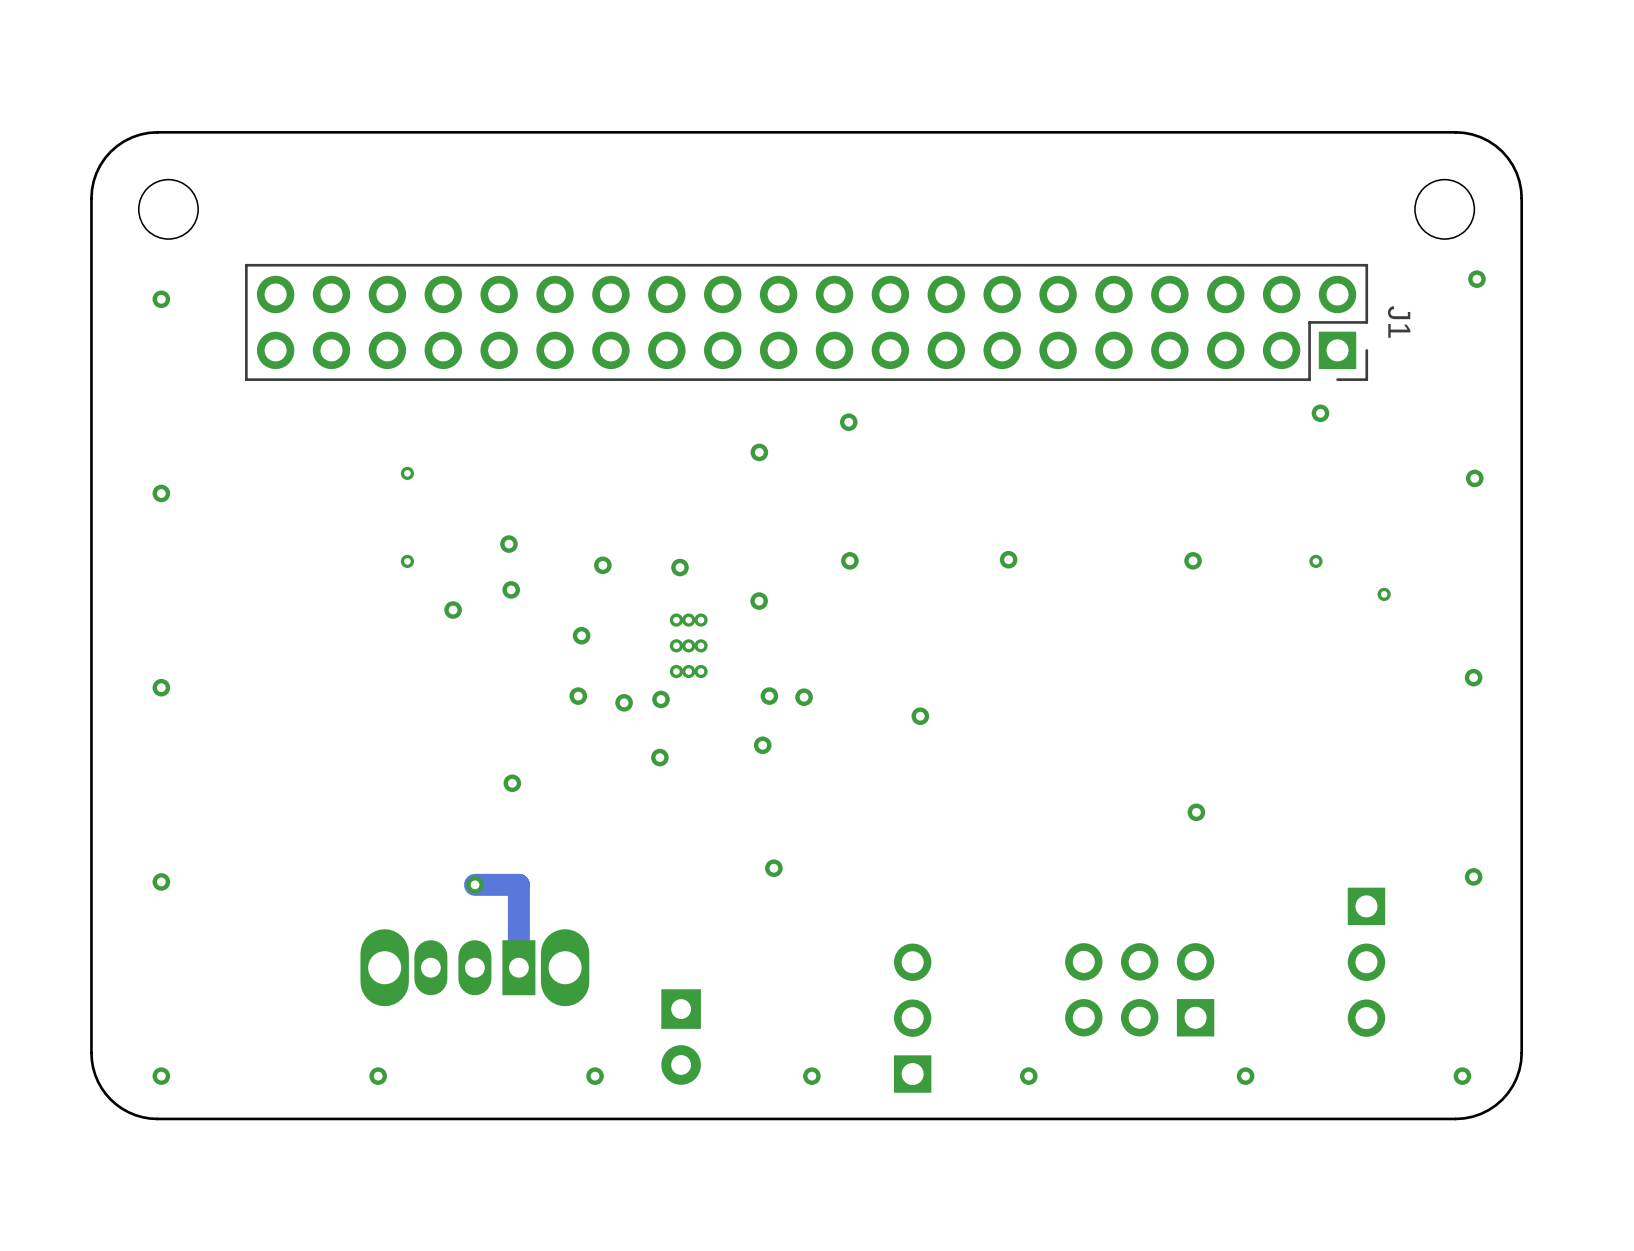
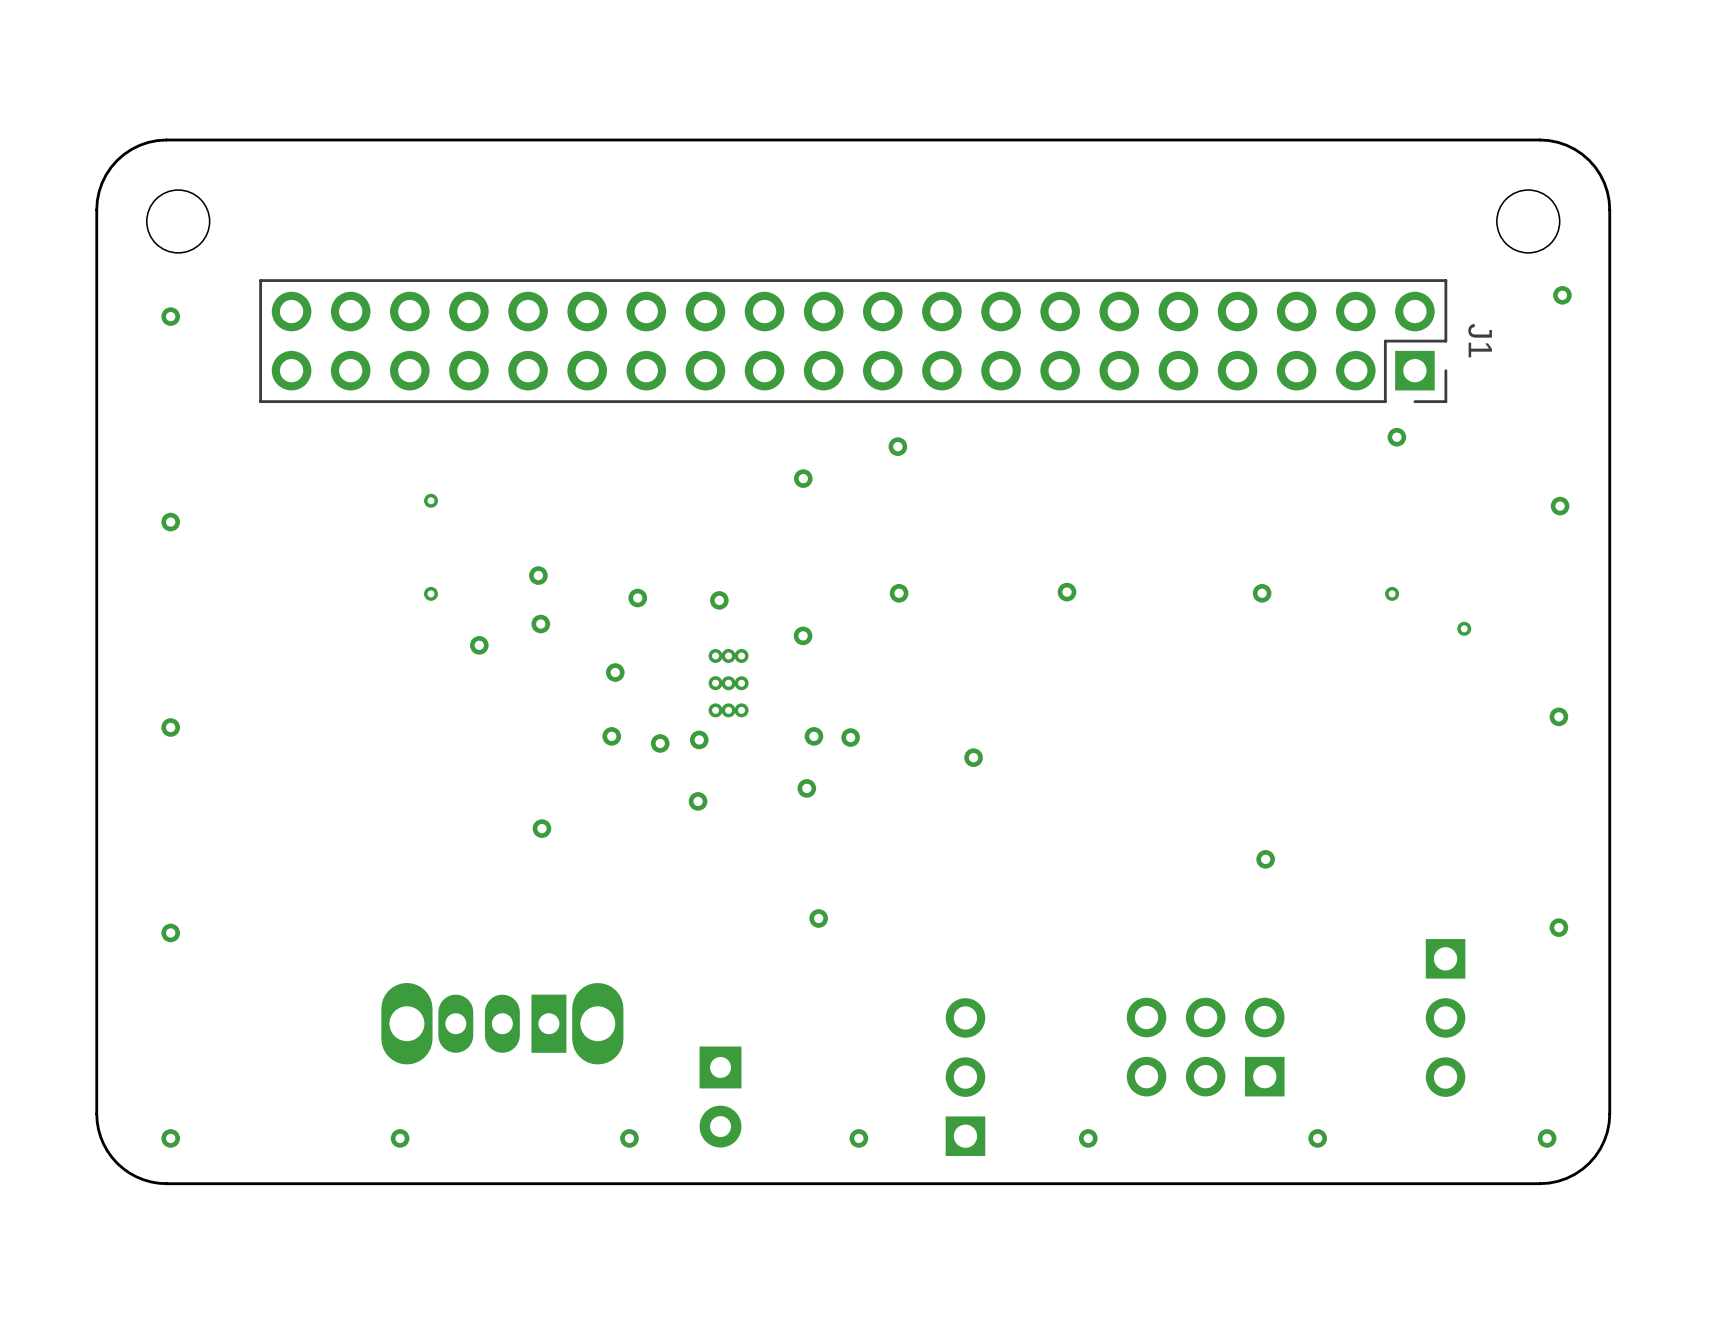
track: (475, 884) (518, 884) (518, 967) -> none
via: (475, 884) -> none

